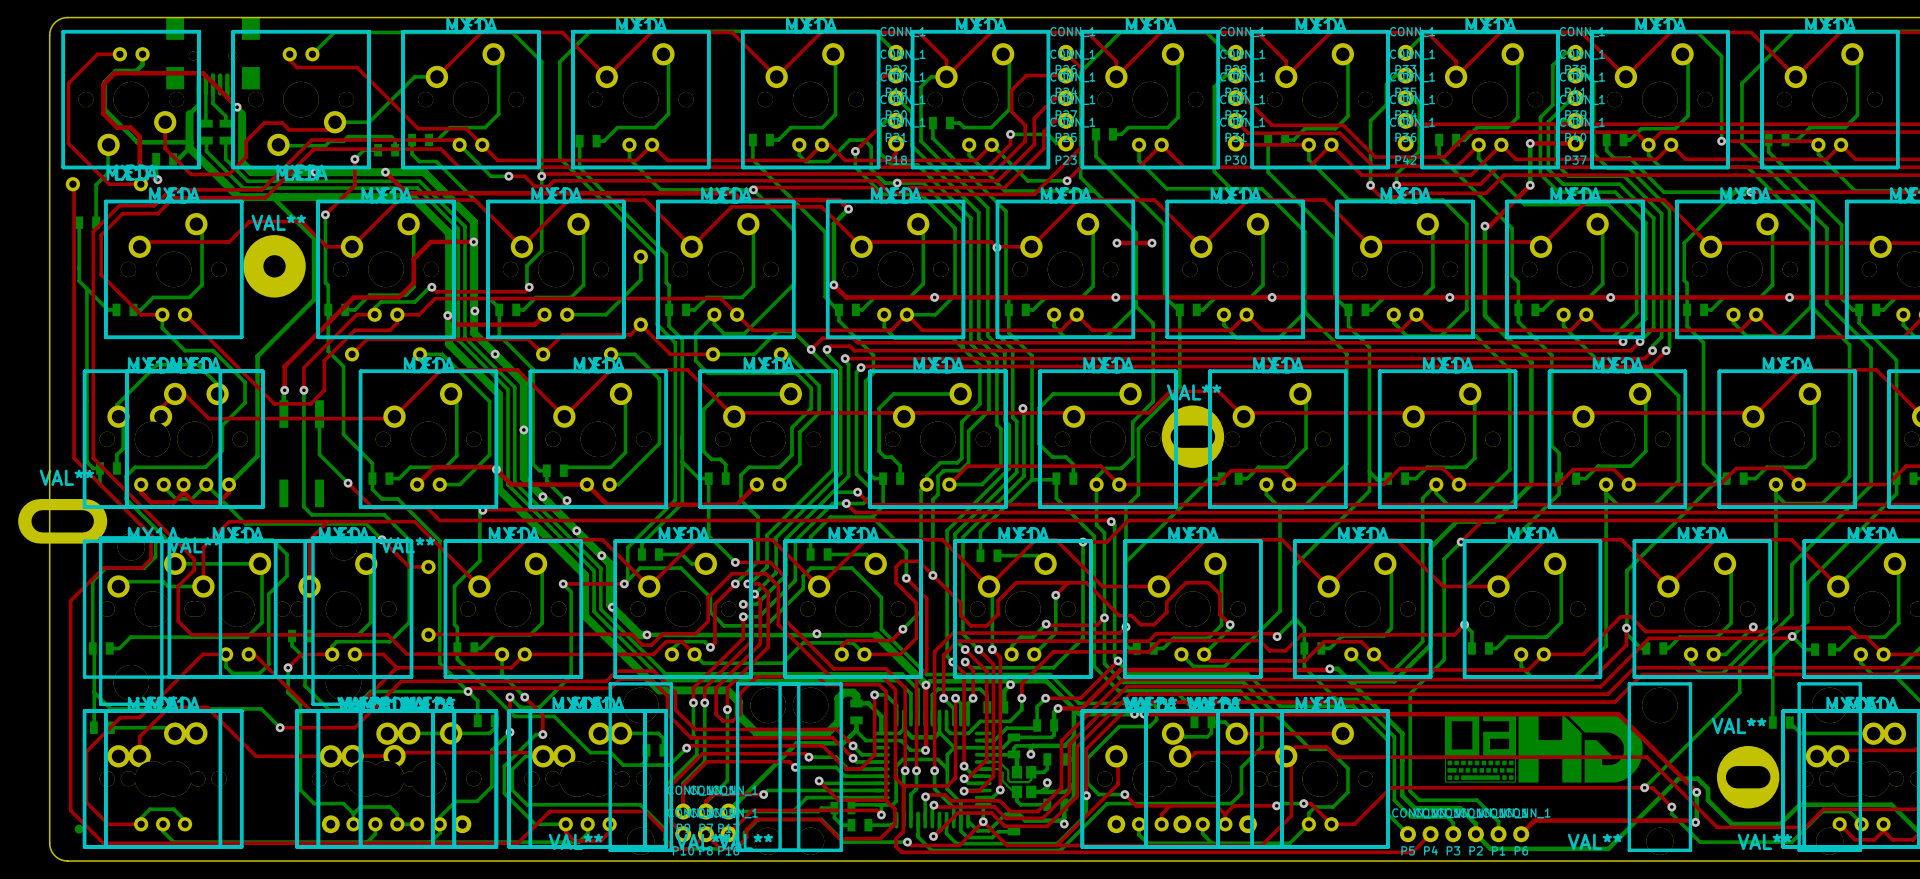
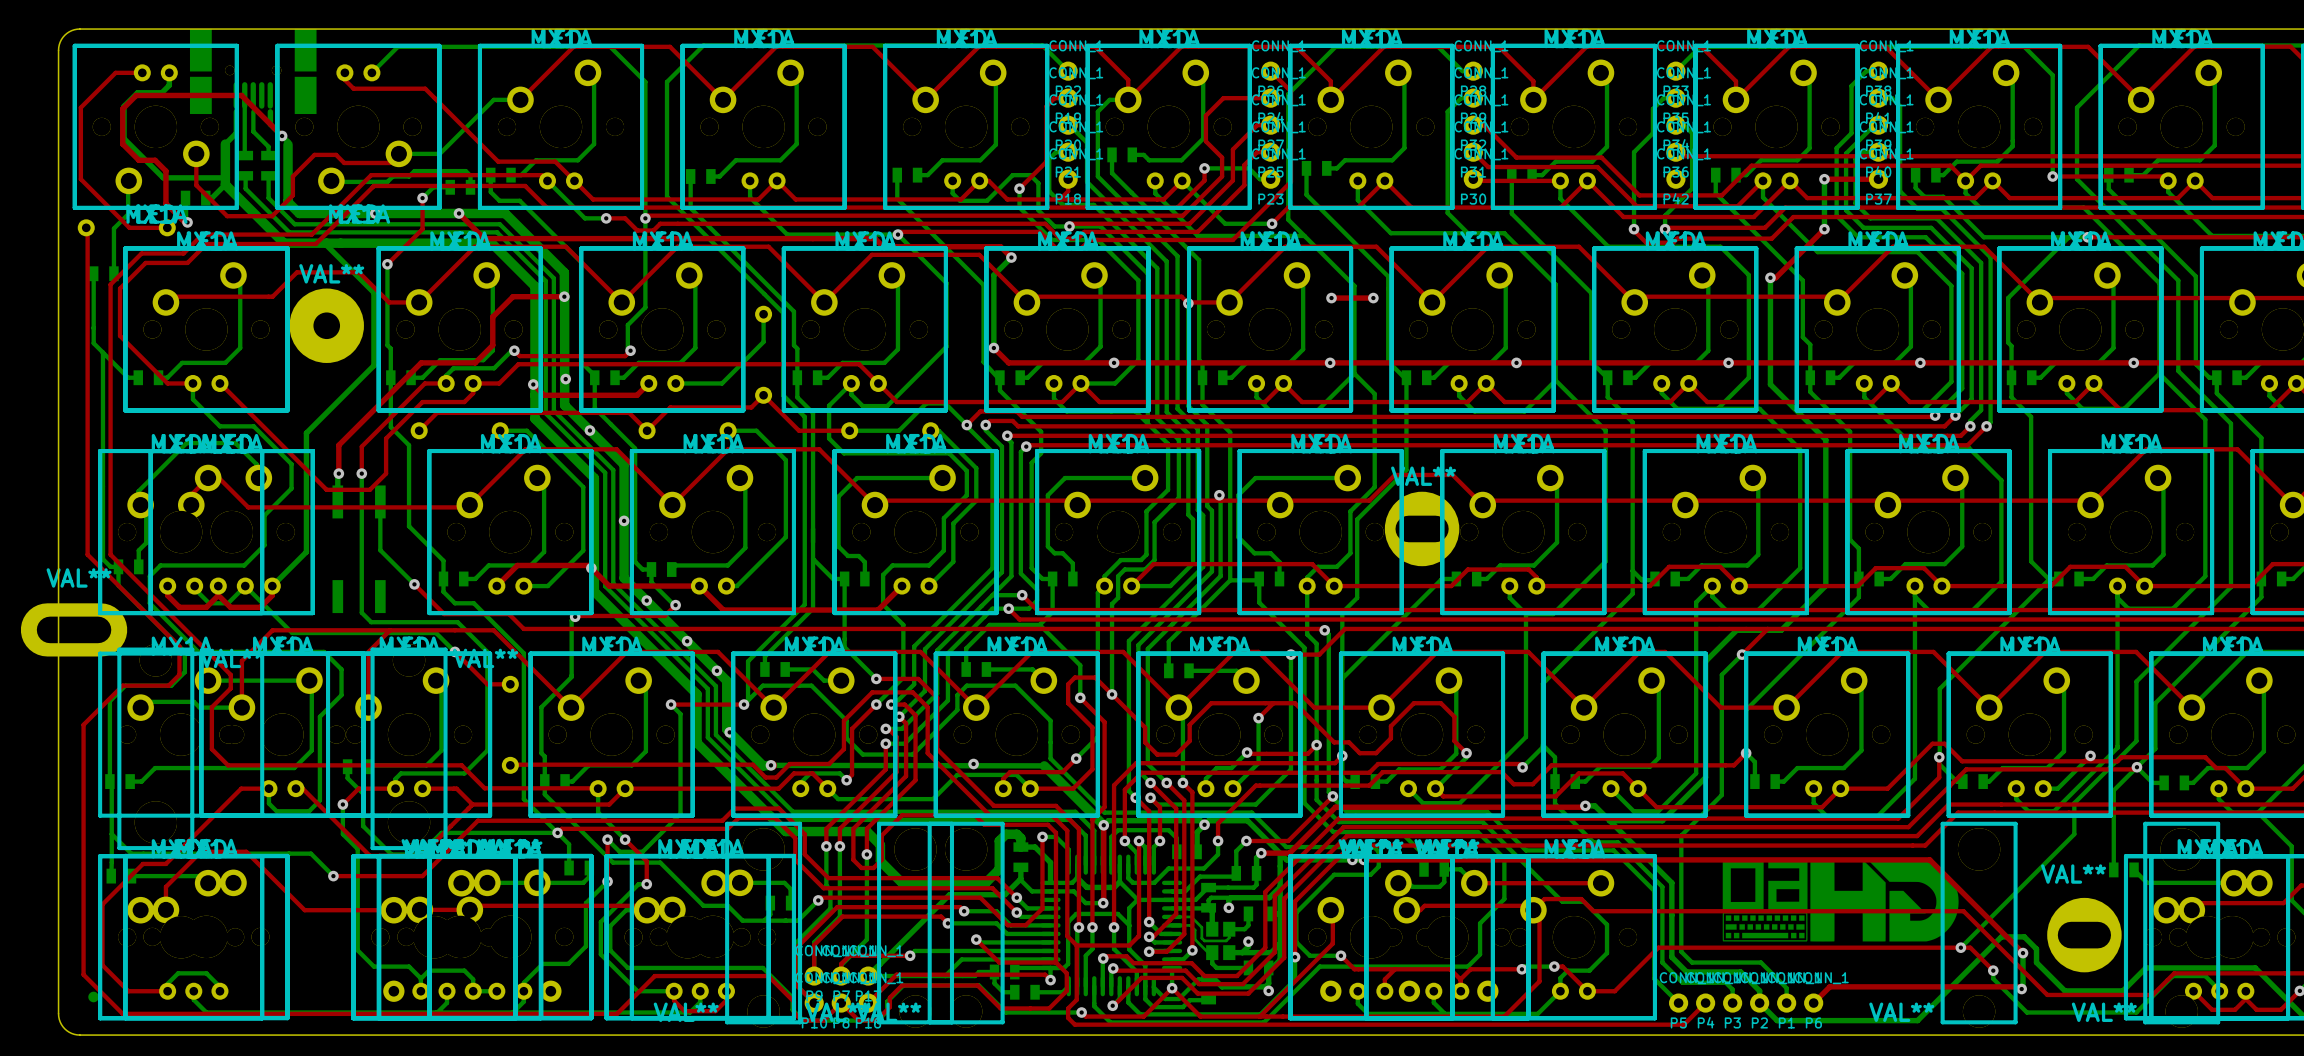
part footprint: [166, 17, 260, 96] -> [189, 28, 317, 115]
bottom track: (205, 86) (205, 122) -> (244, 95) (244, 154)

